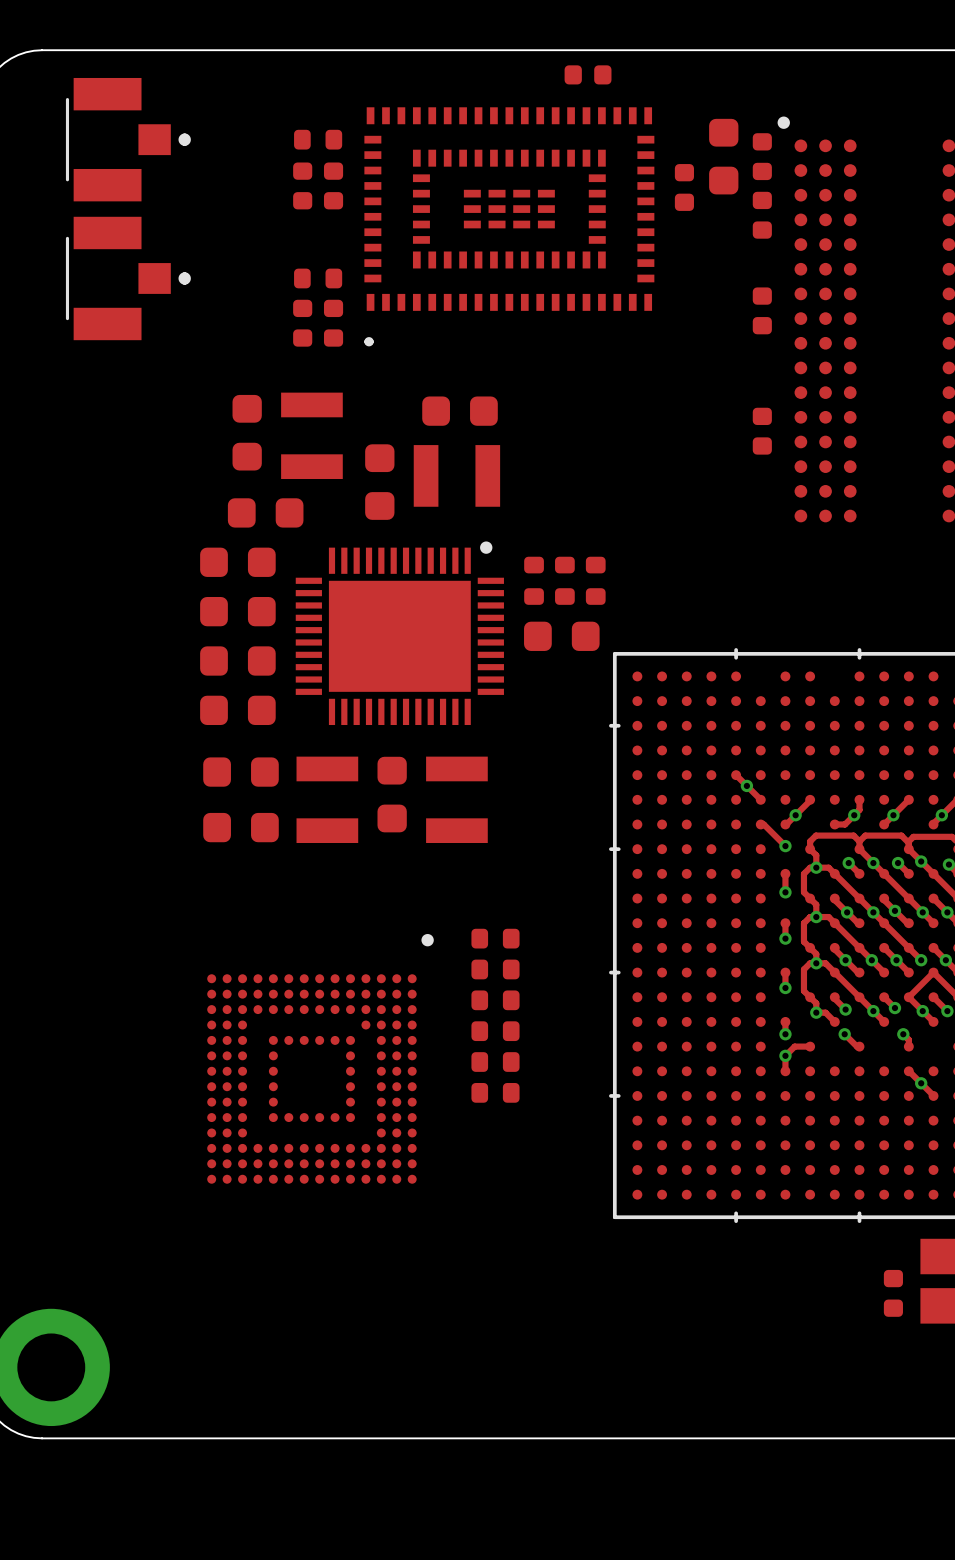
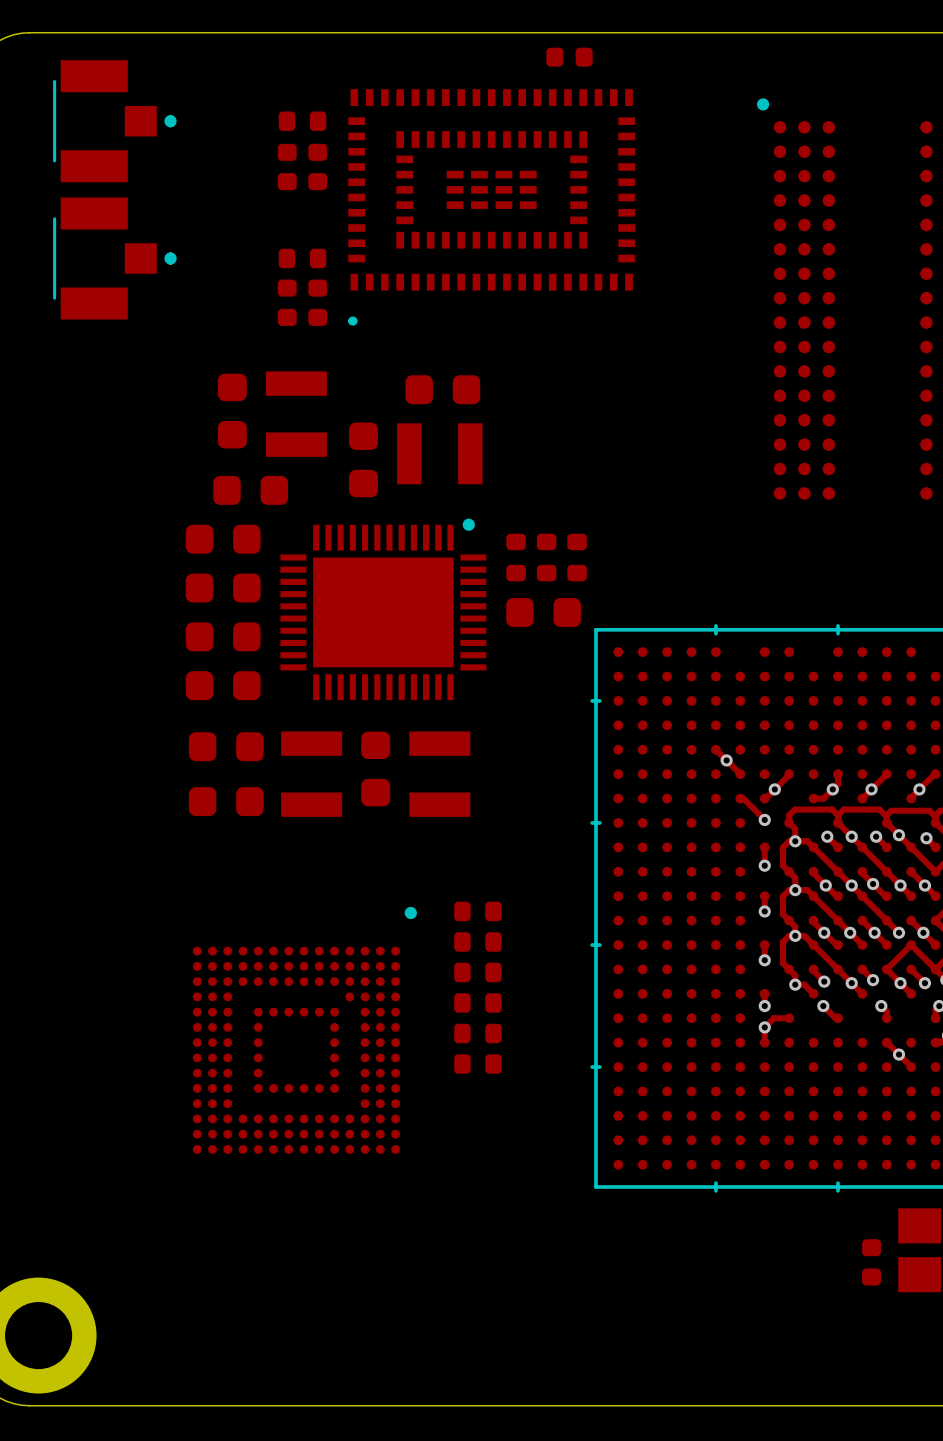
part: (723, 156) -> none
part: (762, 156) -> none
part: (684, 187) -> none
part: (762, 215) -> none
part: (762, 310) -> none
part: (762, 431) -> none

